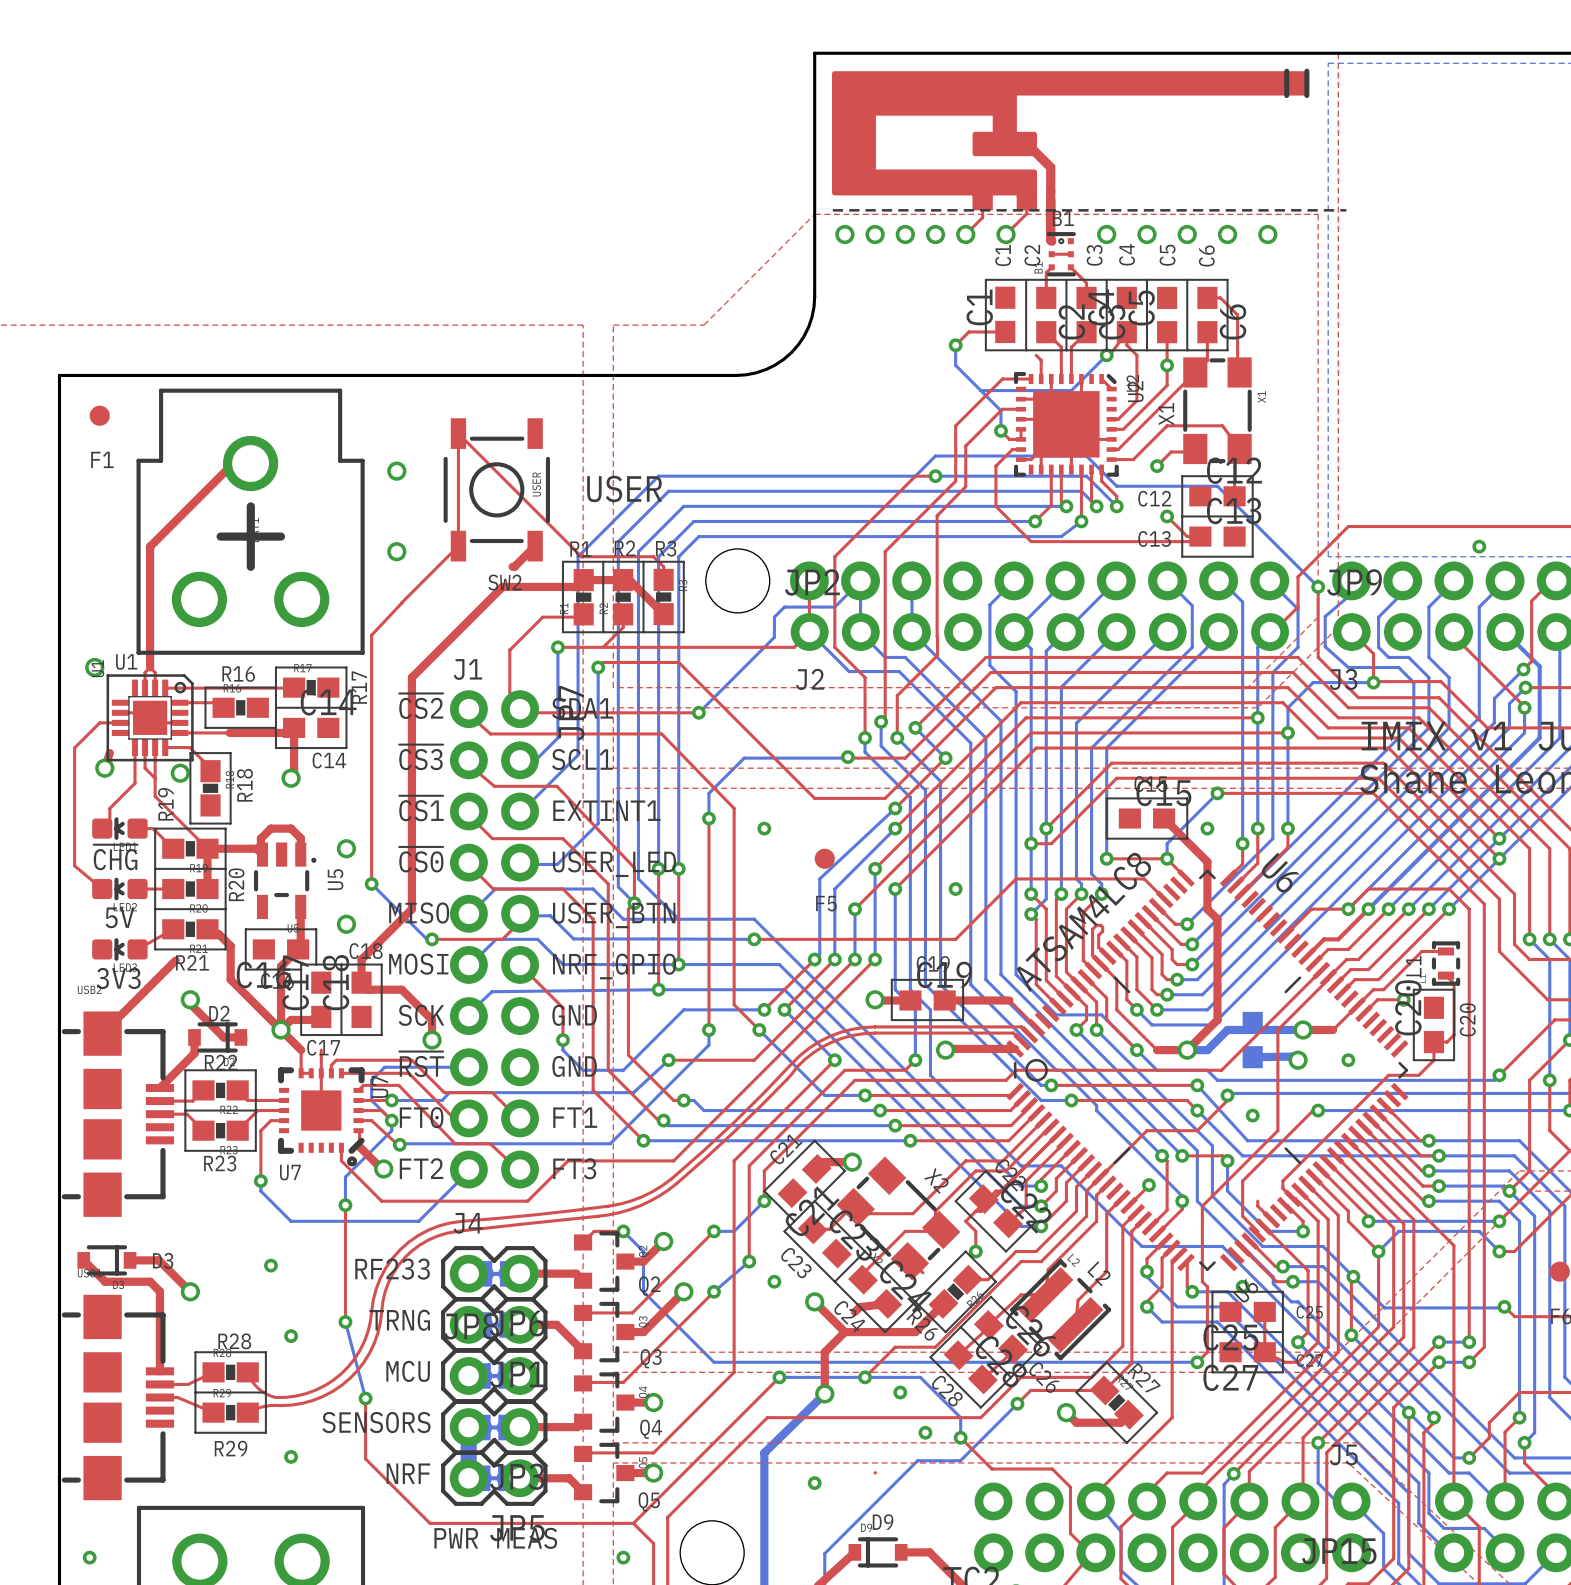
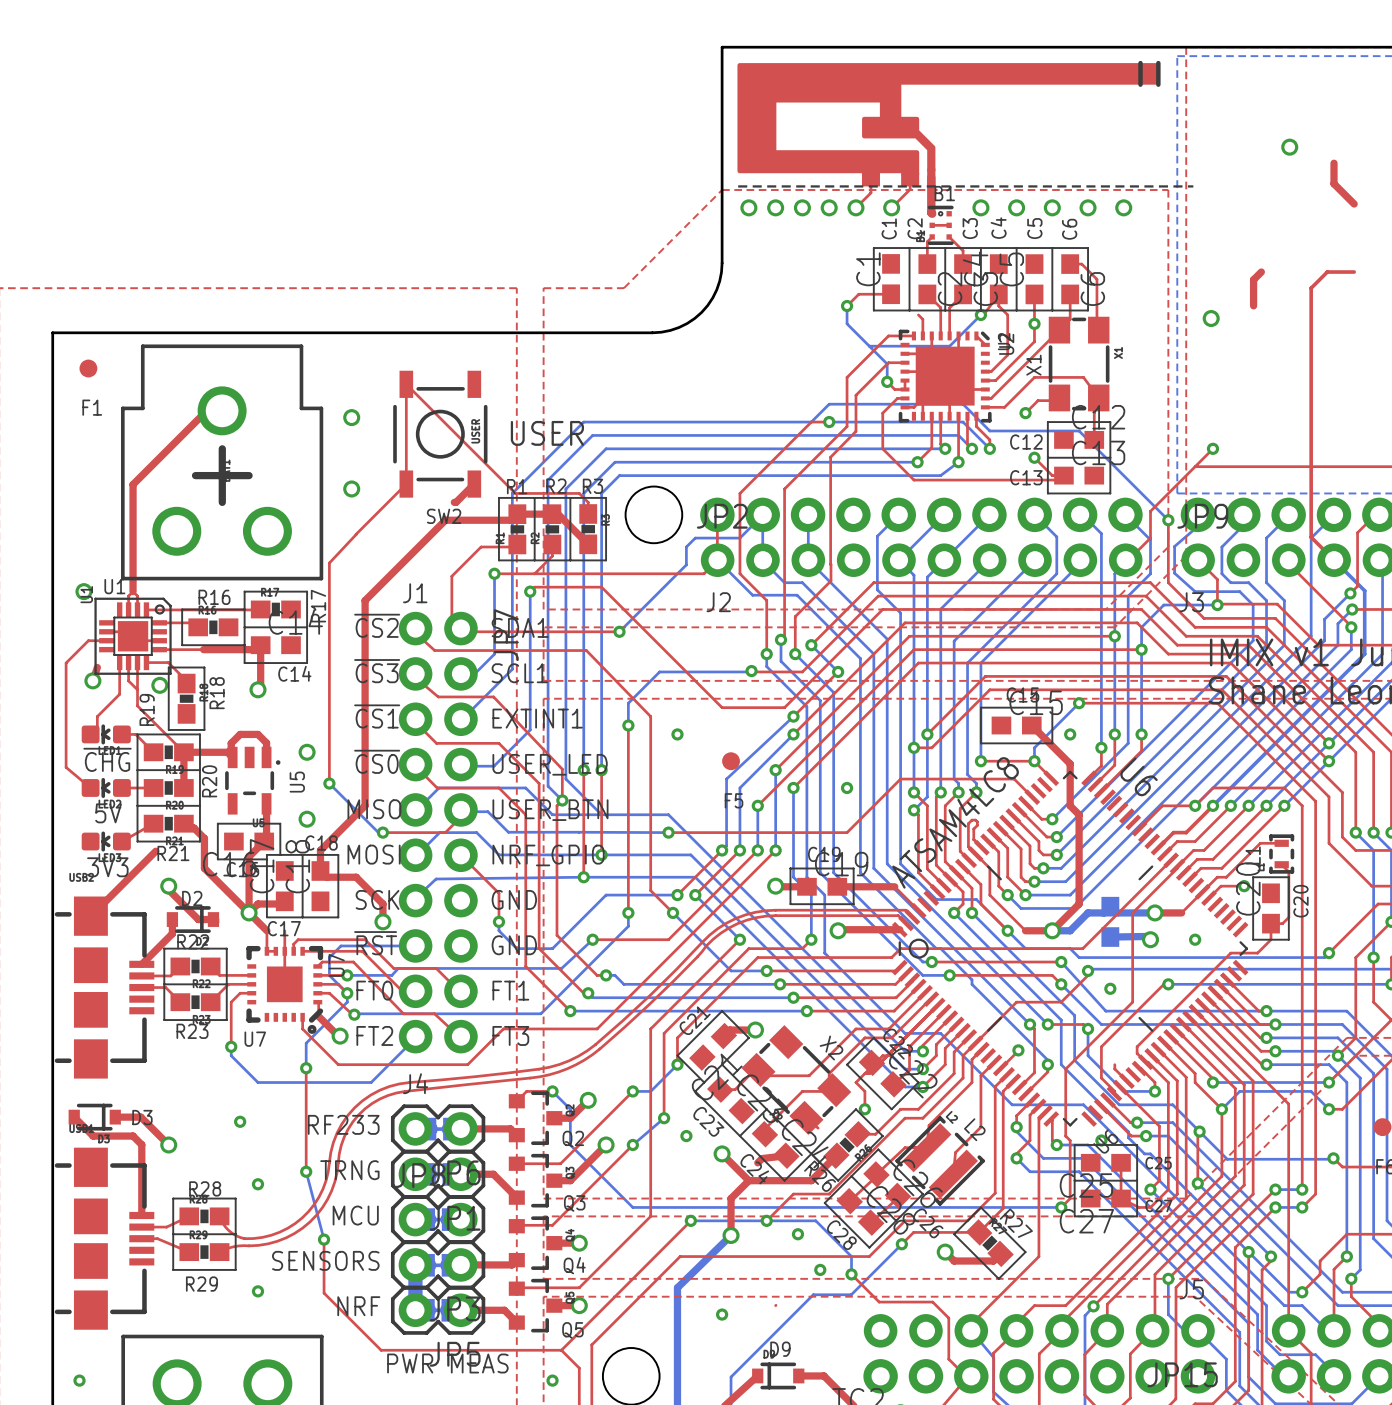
via: none -> (1289, 147)
top track: none -> (1334, 163) (1334, 183) (1354, 204)
top track: none -> (1261, 272) (1253, 279) (1253, 305)
top track: none -> (1354, 272) (1327, 272) (1311, 288) (1311, 537) (1334, 560)
via: none -> (1211, 318)
top track: none -> (1212, 448) (1195, 466)
via: none -> (1212, 448)
via: (1479, 546) -> none

